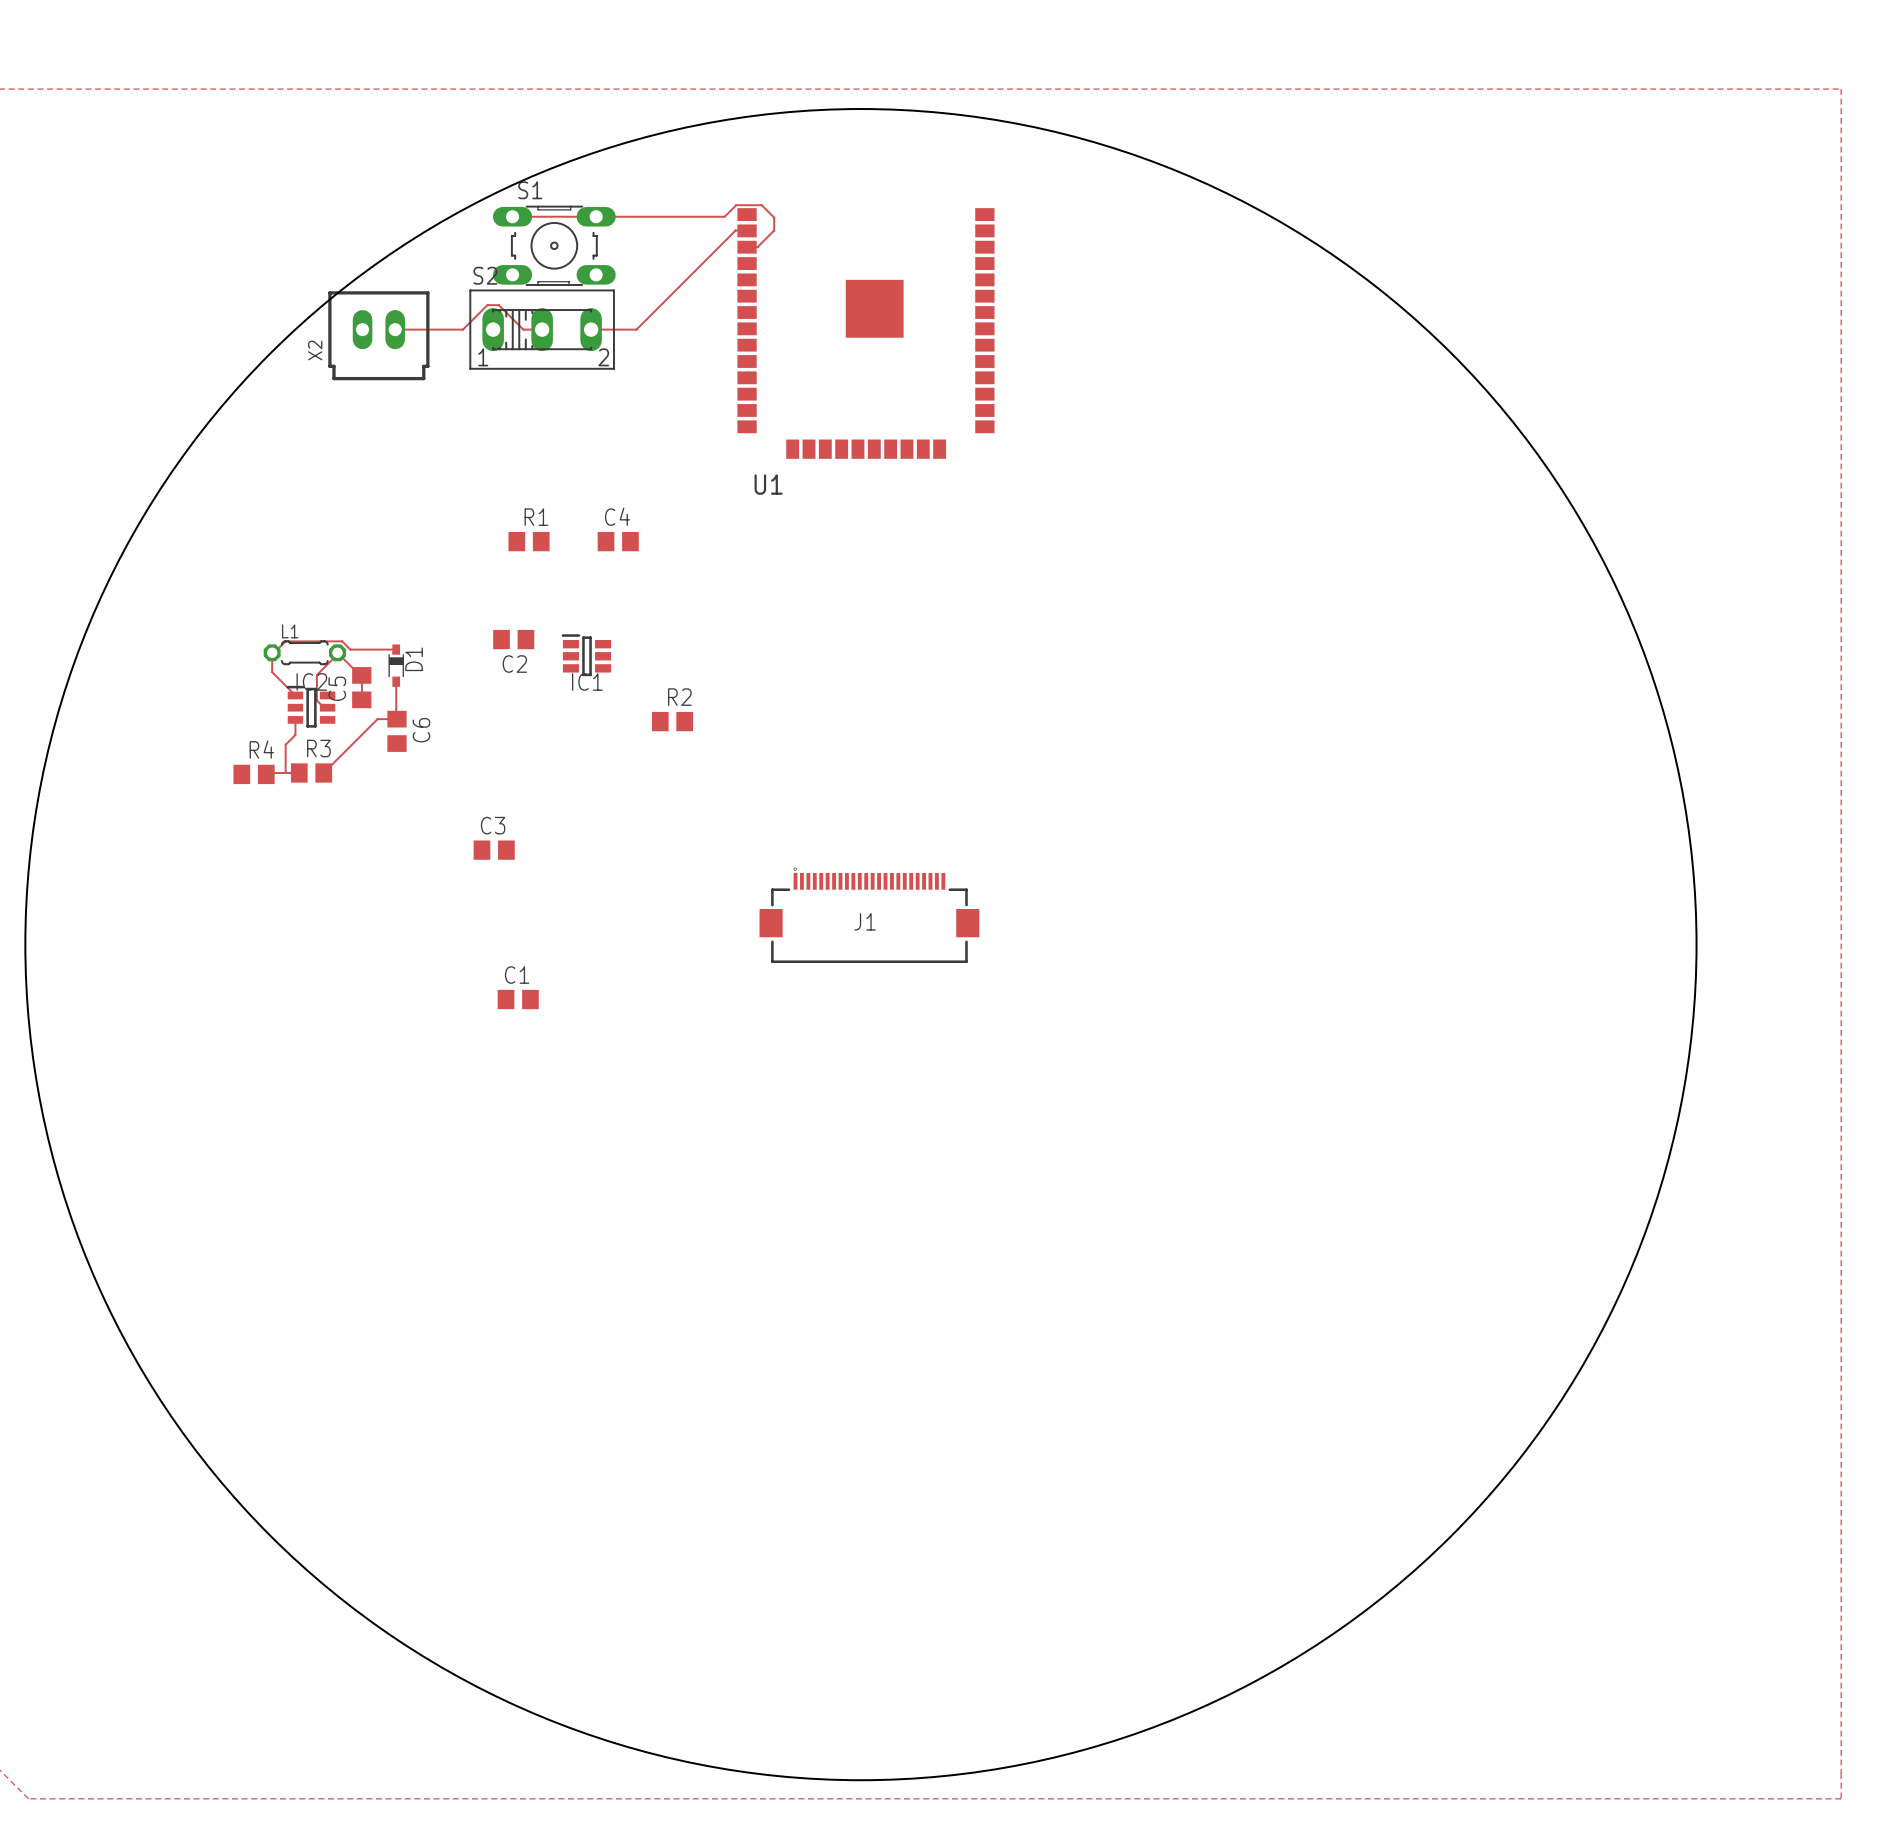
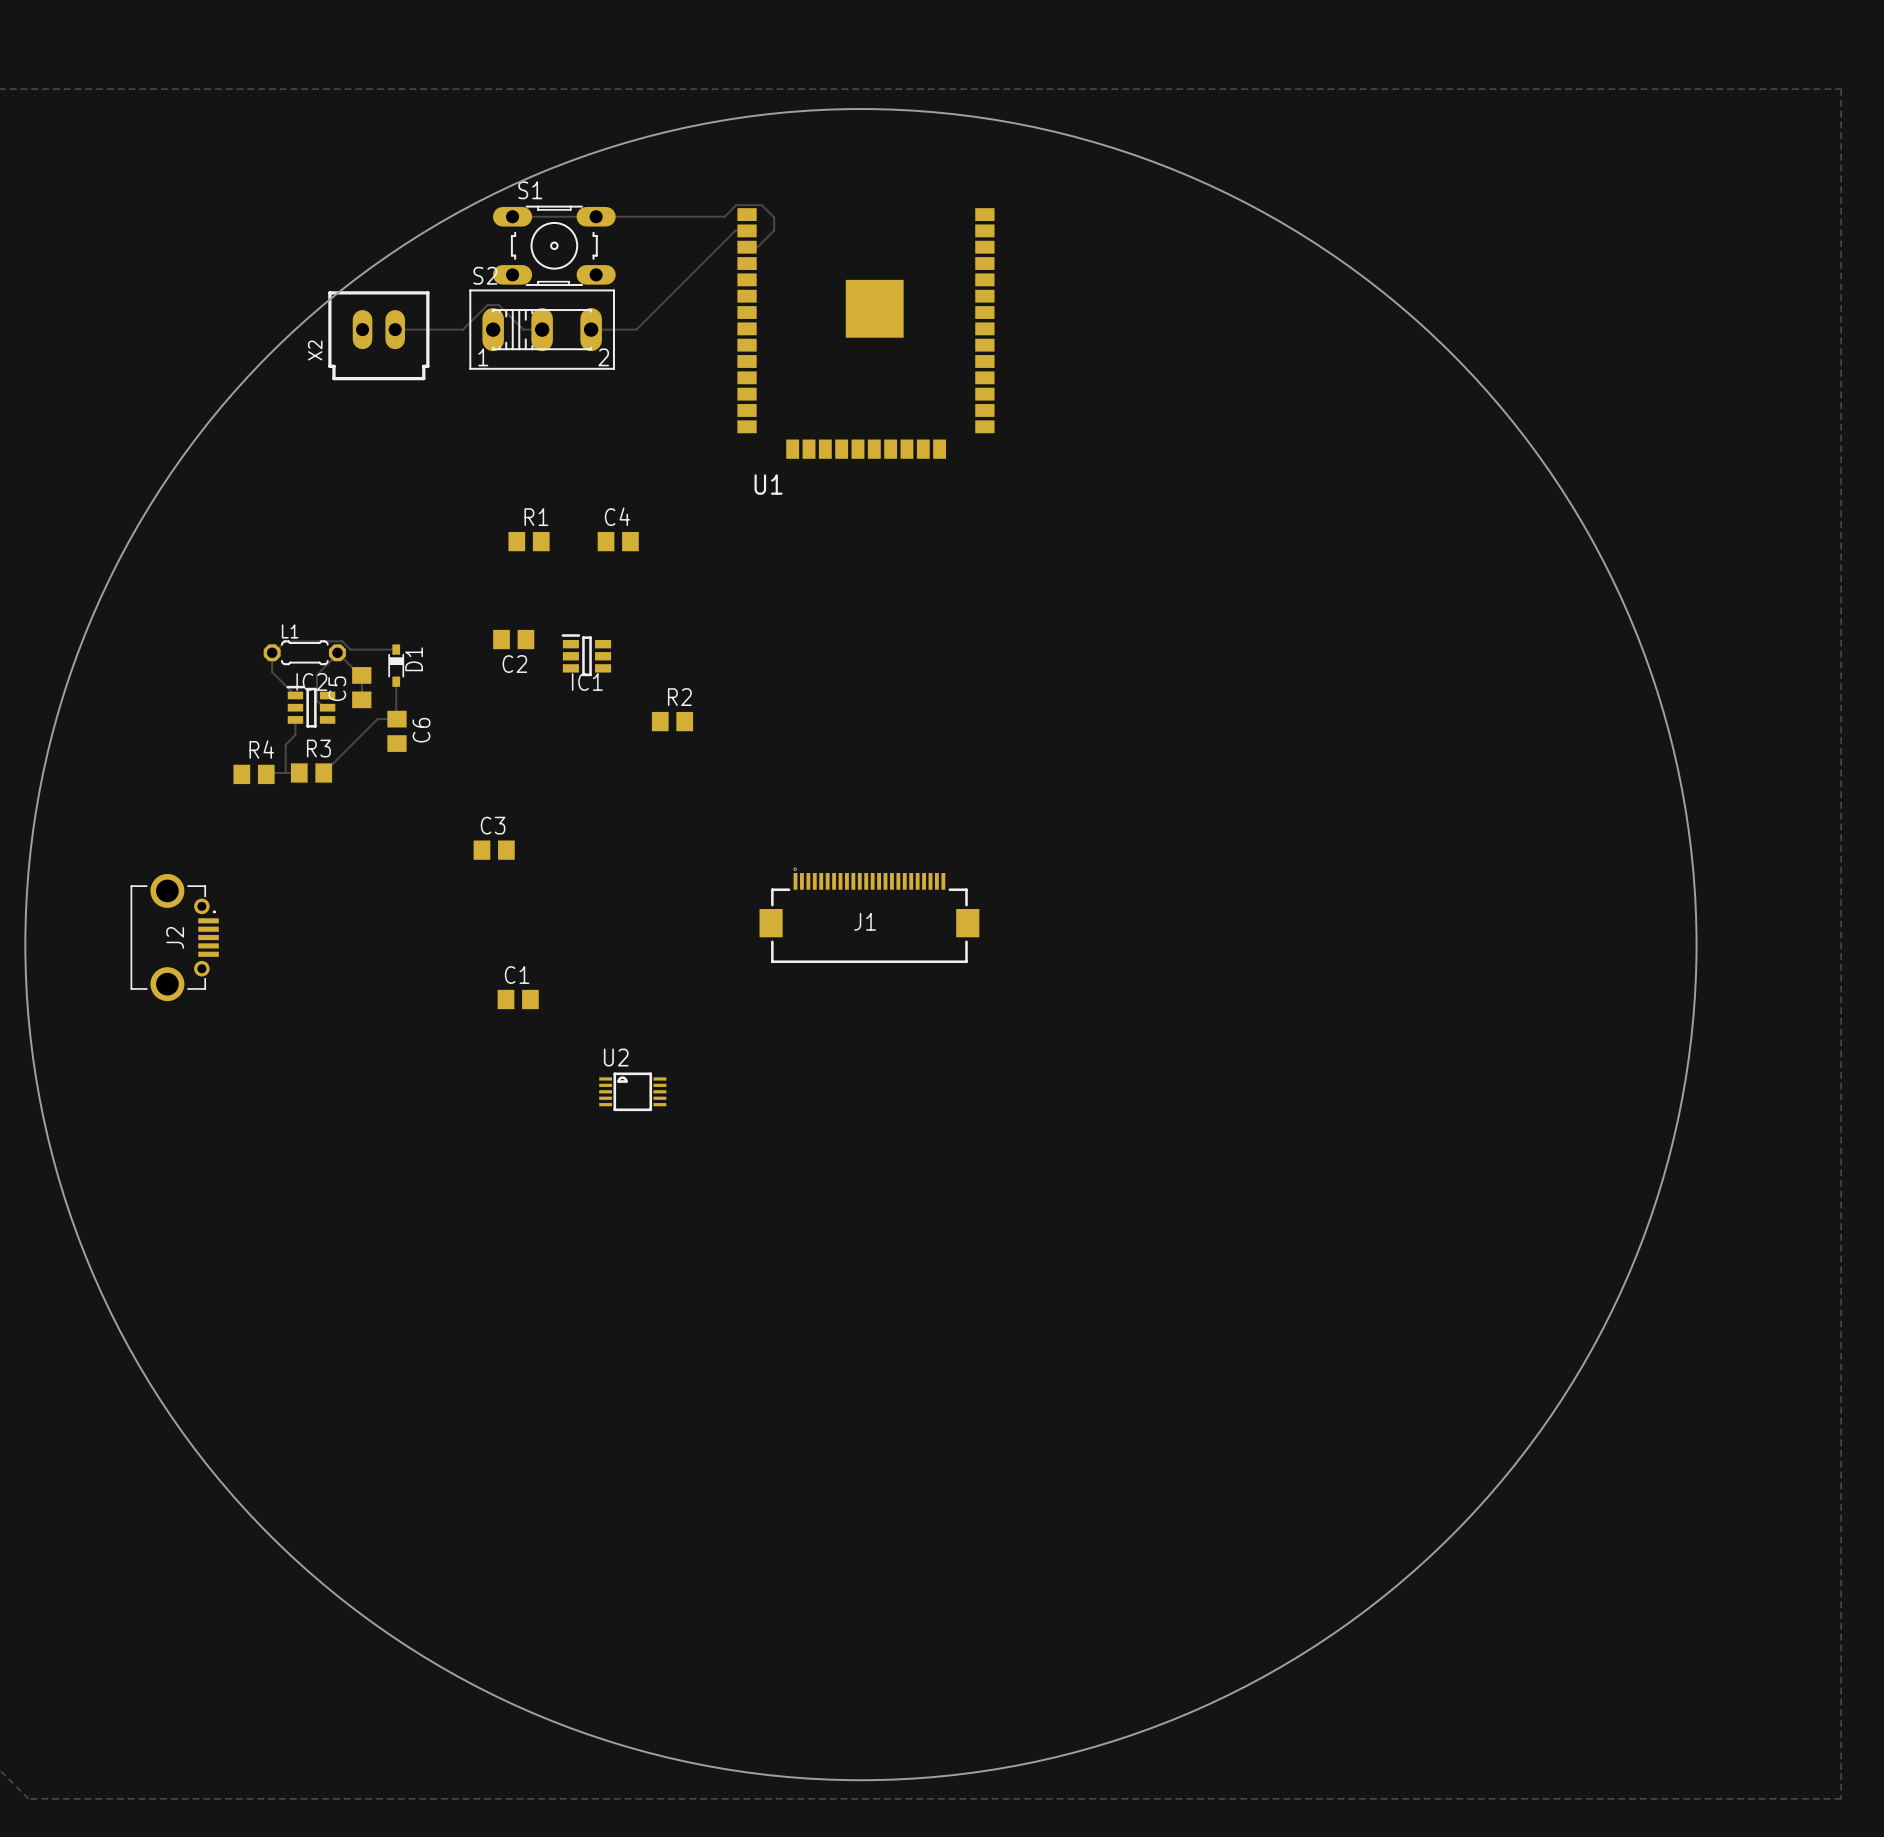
J2: none -> (174, 937)
U2: none -> (632, 1091)

